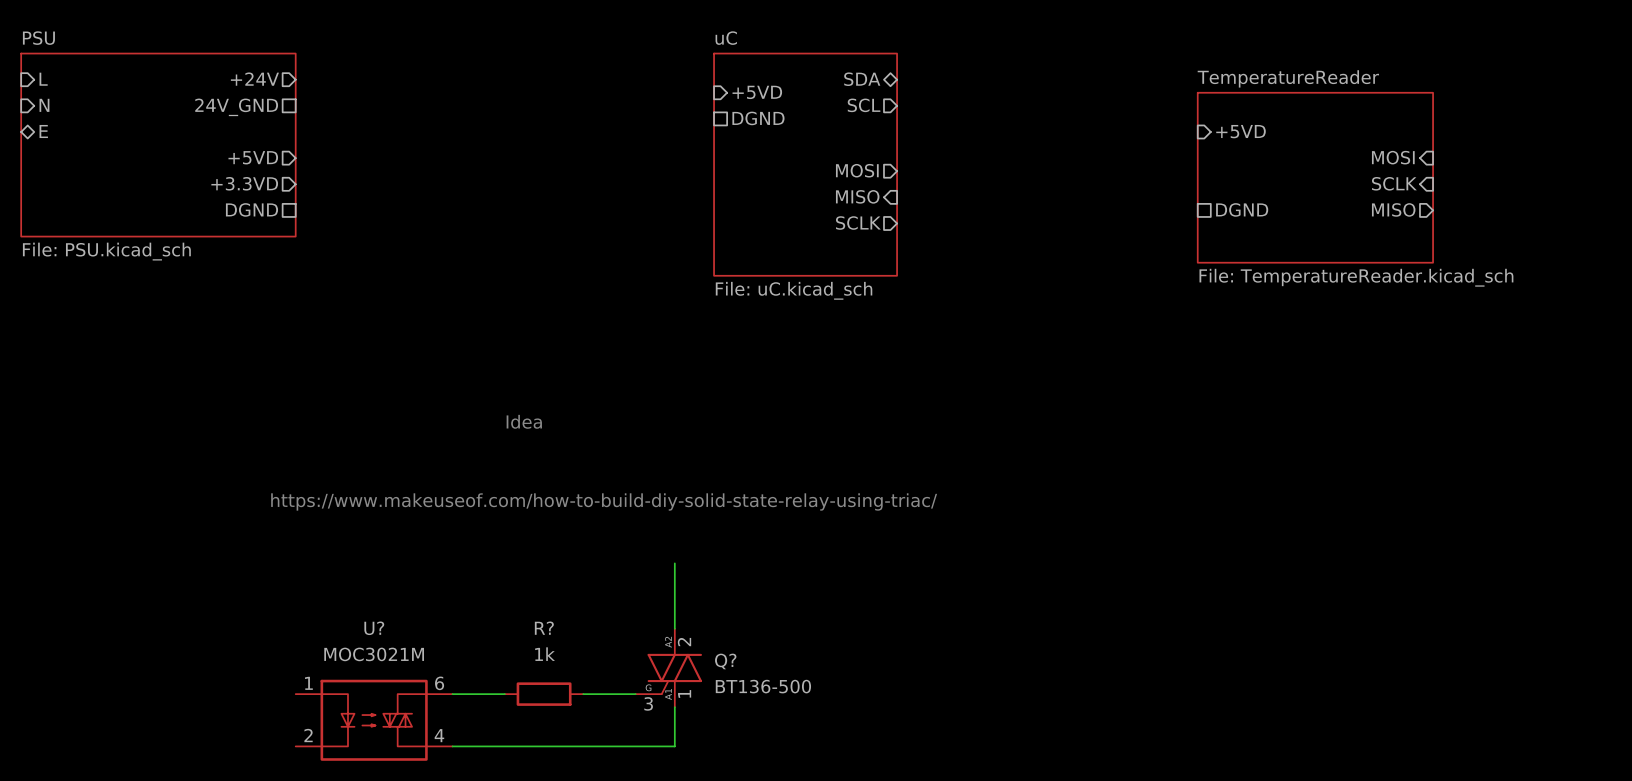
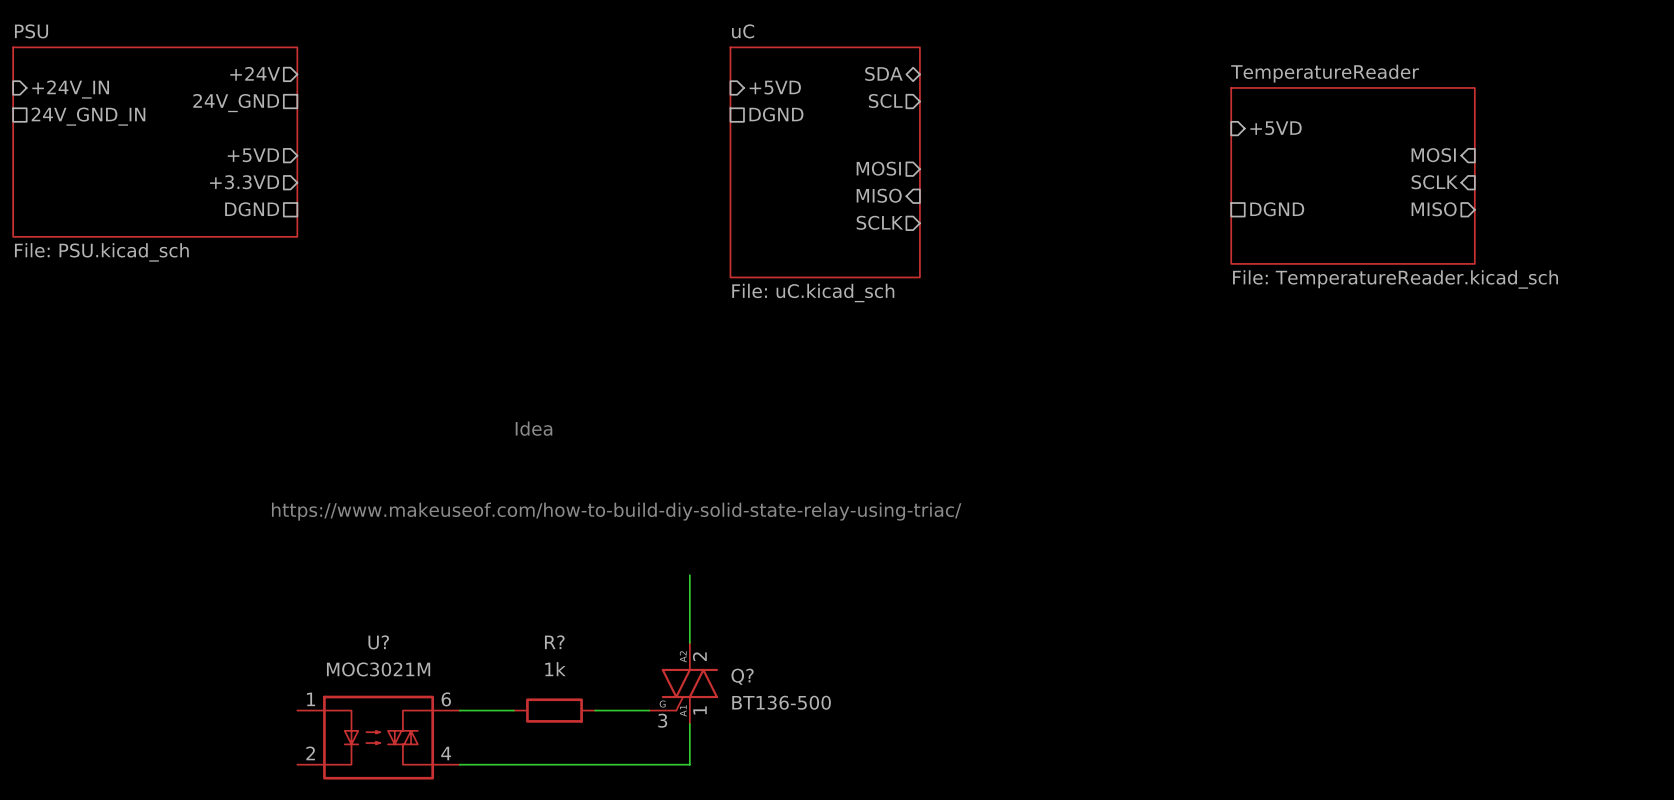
sheet pin: L (43, 79) -> none
sheet pin: none -> +24V_IN (70, 89)
sheet pin: N (44, 105) -> none
sheet pin: none -> 24V_GND_IN (88, 116)
sheet pin: E (43, 131) -> none

